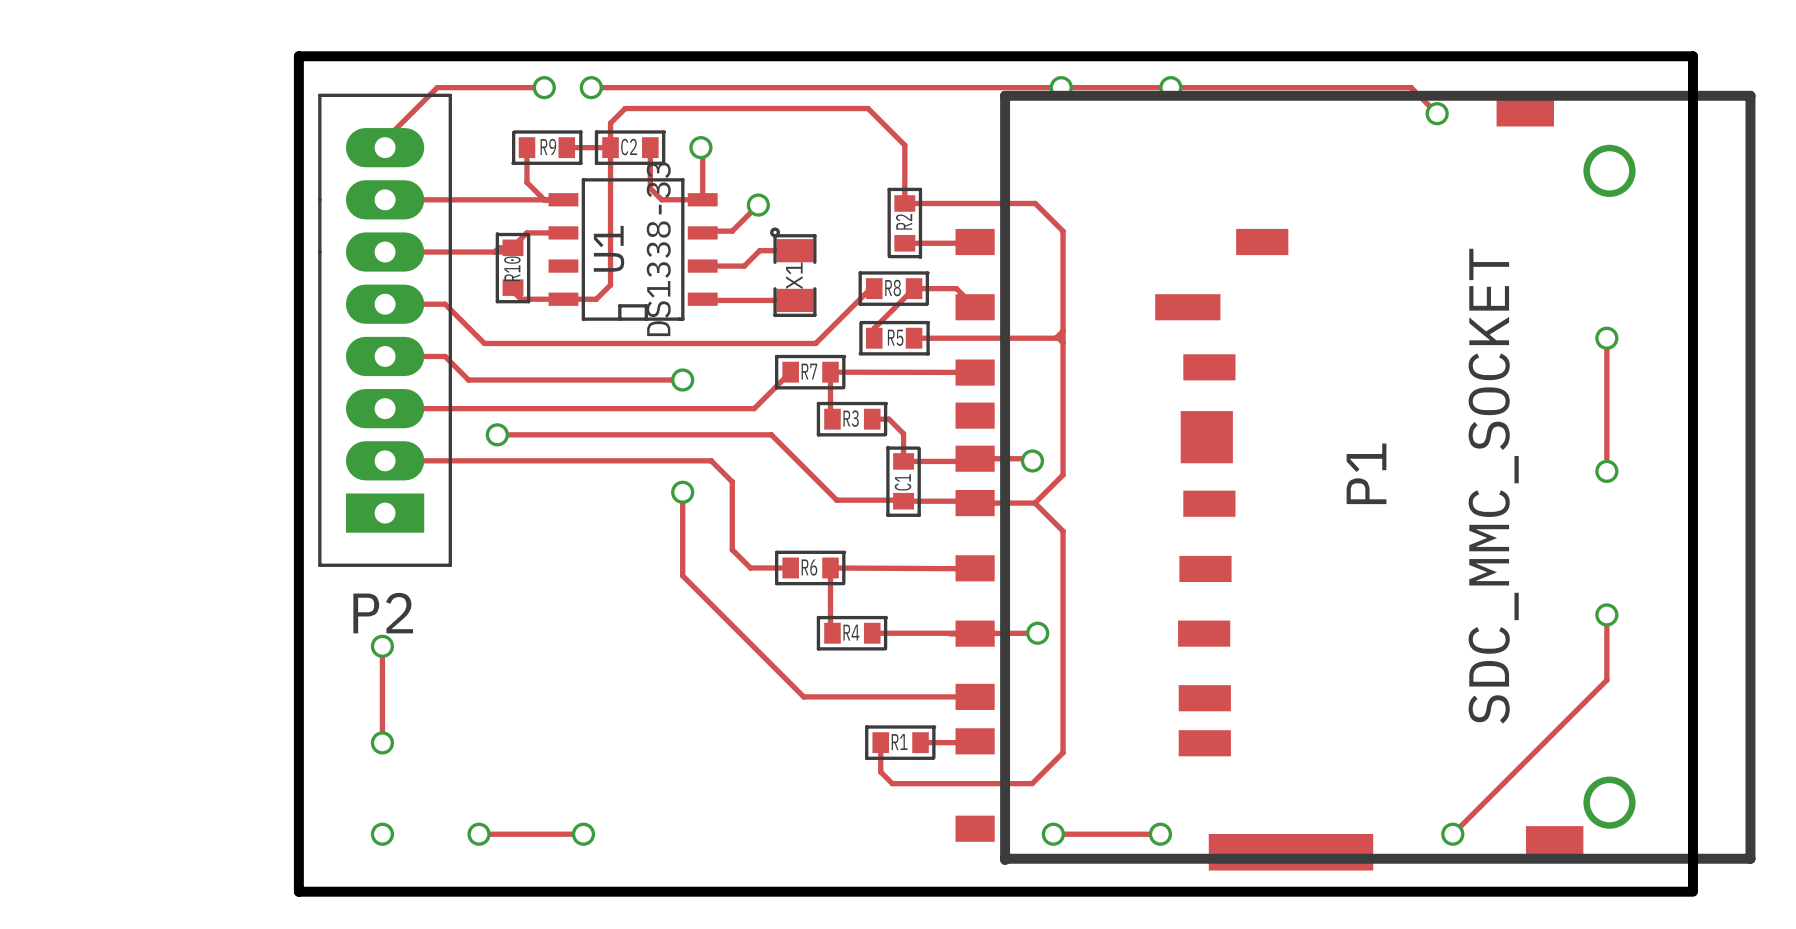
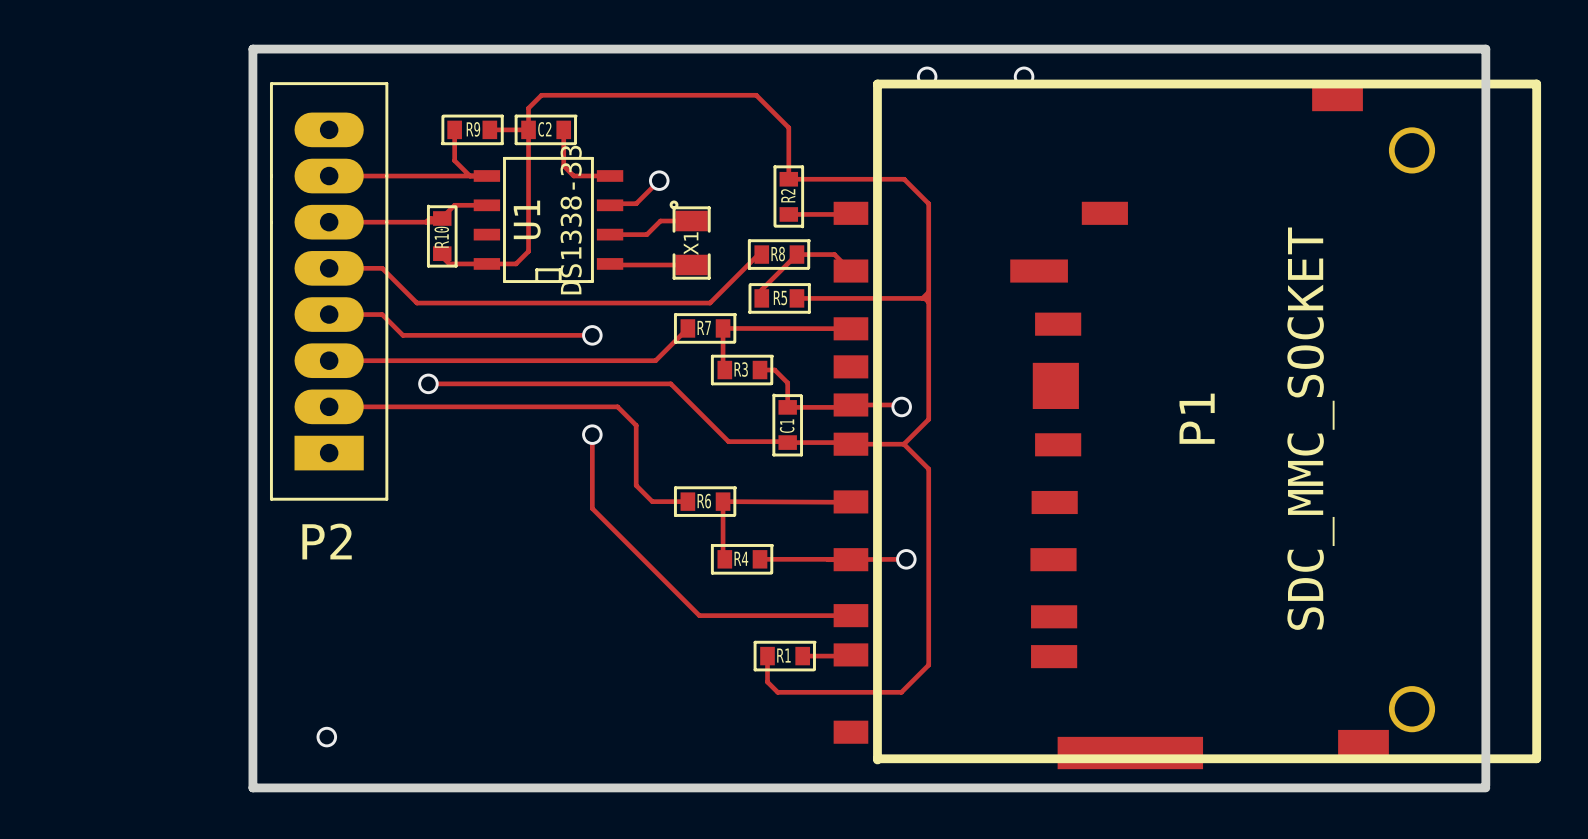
track: (544, 87) (437, 87) (385, 139) (385, 147) -> none
via: (544, 87) -> none
track: (591, 87) (1411, 87) (1437, 113) -> none
via: (591, 87) -> none
via: (1437, 113) -> none
track: (700, 147) (702, 149) (702, 199) -> none
via: (700, 147) -> none
track: (1606, 338) (1606, 471) -> none
via: (1606, 338) -> none
via: (1606, 471) -> none
track: (1606, 614) (1606, 680) (1452, 834) -> none
via: (1606, 614) -> none
track: (382, 646) (382, 742) -> none
via: (382, 646) -> none
via: (382, 742) -> none
track: (479, 834) (583, 834) -> none
via: (479, 834) -> none
via: (583, 834) -> none
track: (1053, 834) (1160, 834) -> none
via: (1053, 834) -> none
via: (1160, 834) -> none
via: (1452, 834) -> none

